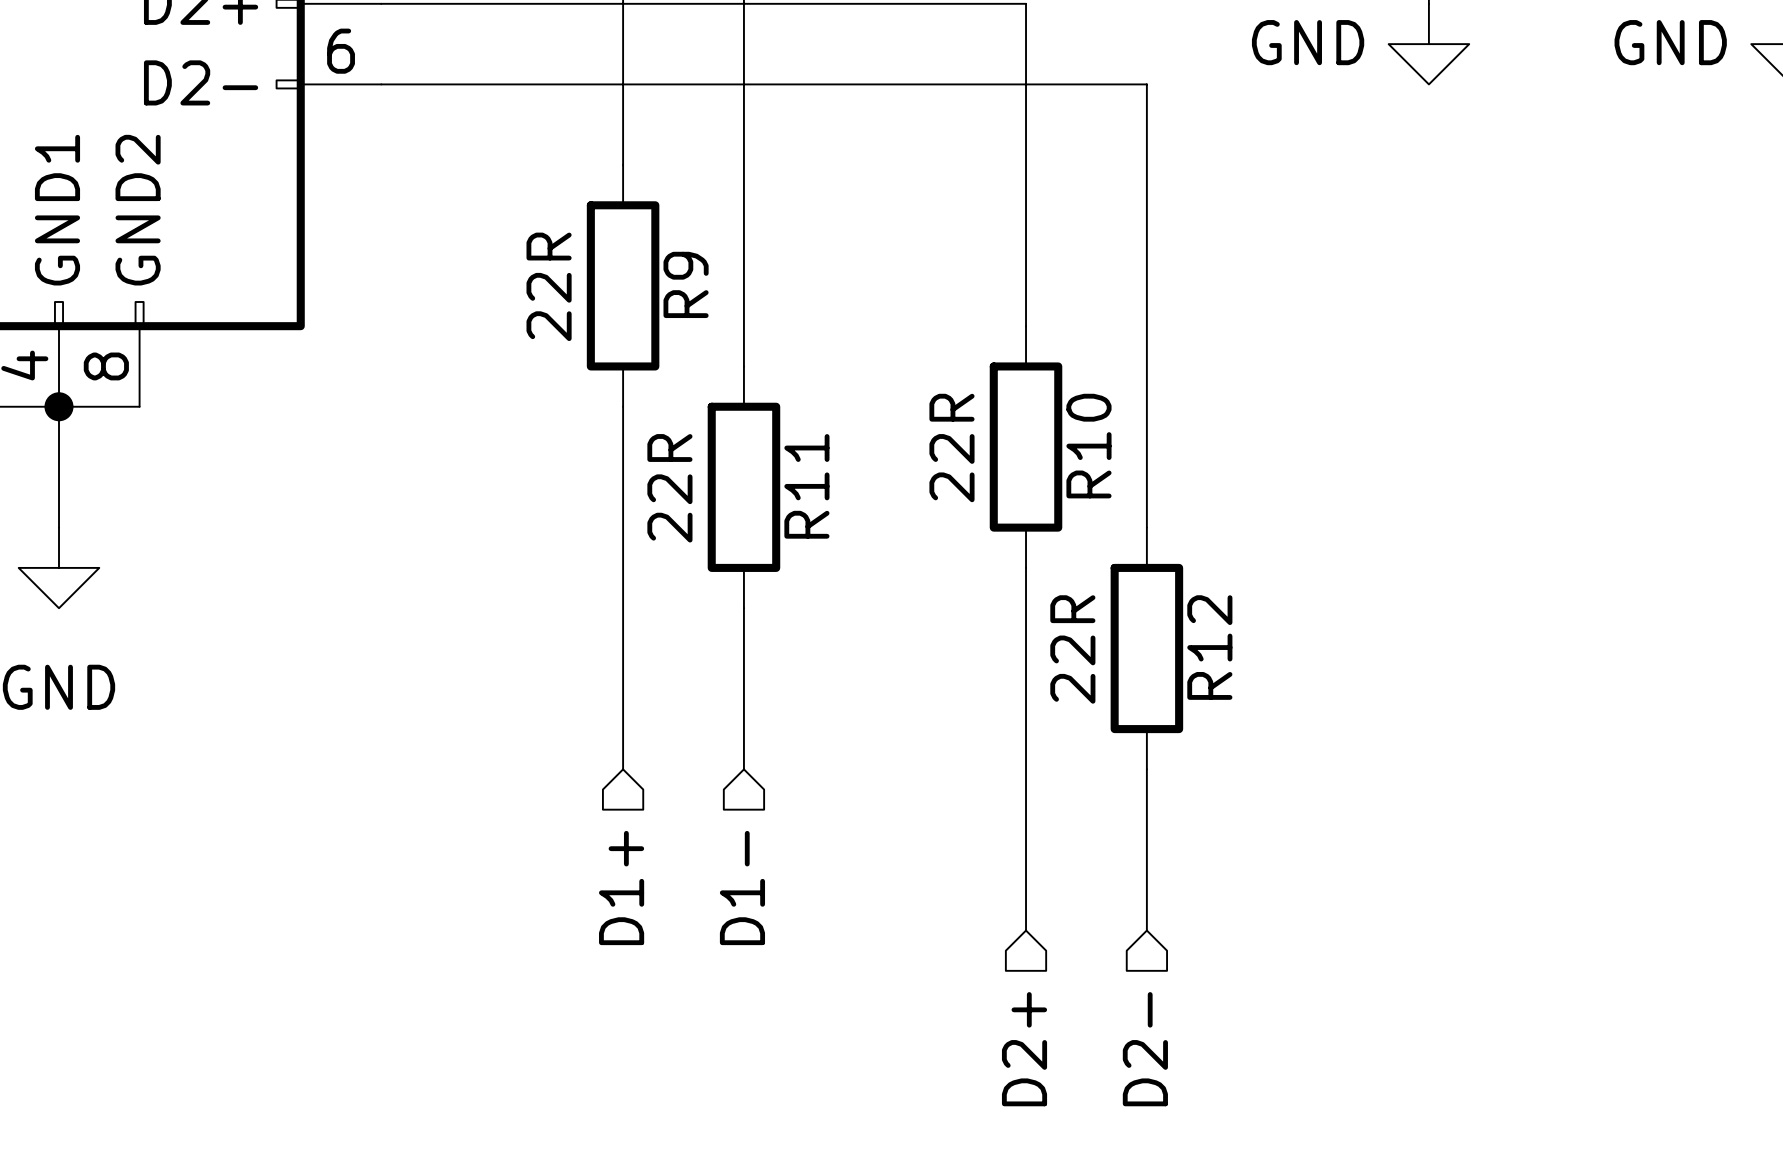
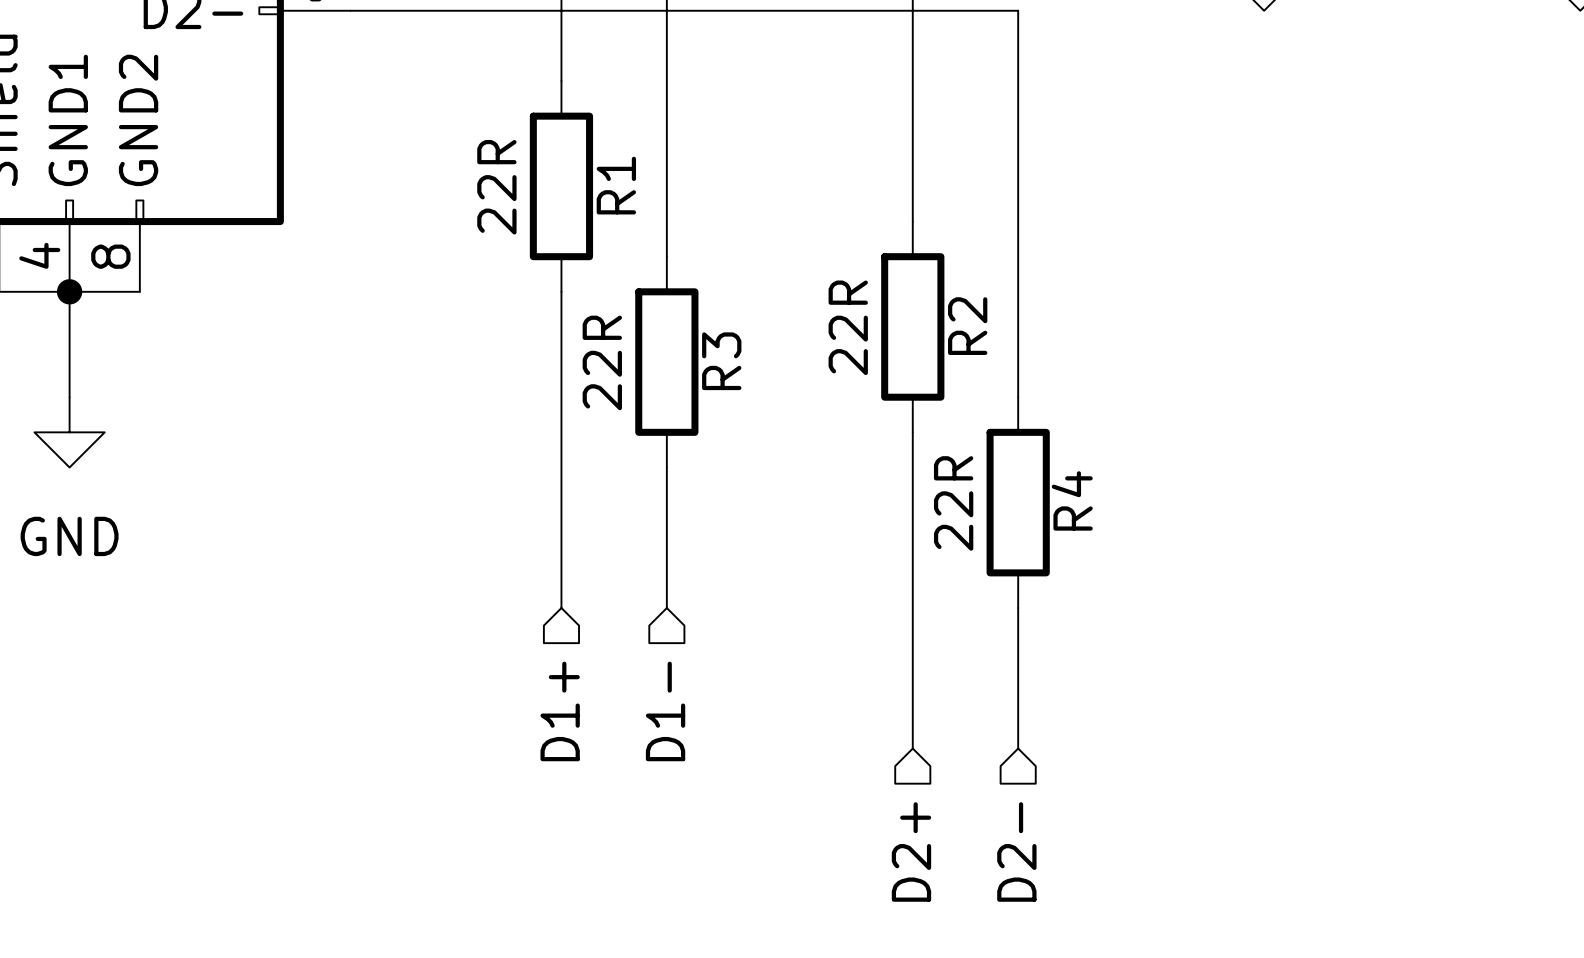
R9 name: R9 (686, 284) -> R1 (616, 185)
R10 name: R10 (1088, 446) -> R2 (967, 326)
R11 name: R11 (806, 486) -> R3 (721, 361)
R12 name: R12 (1209, 647) -> R4 (1072, 500)

